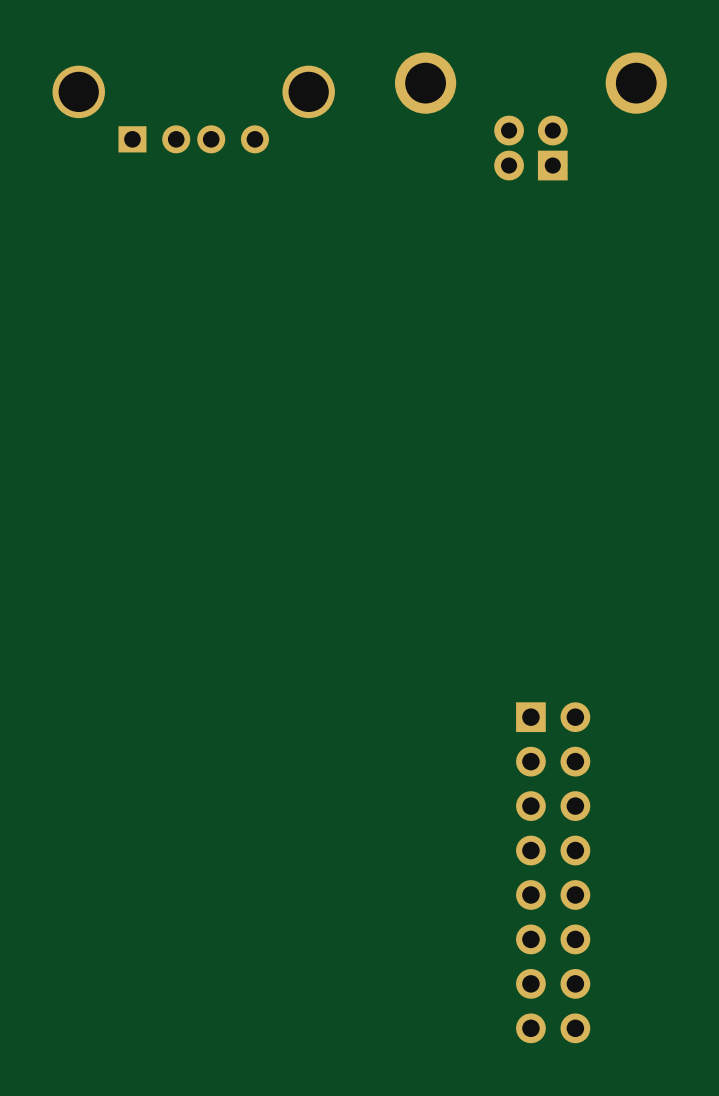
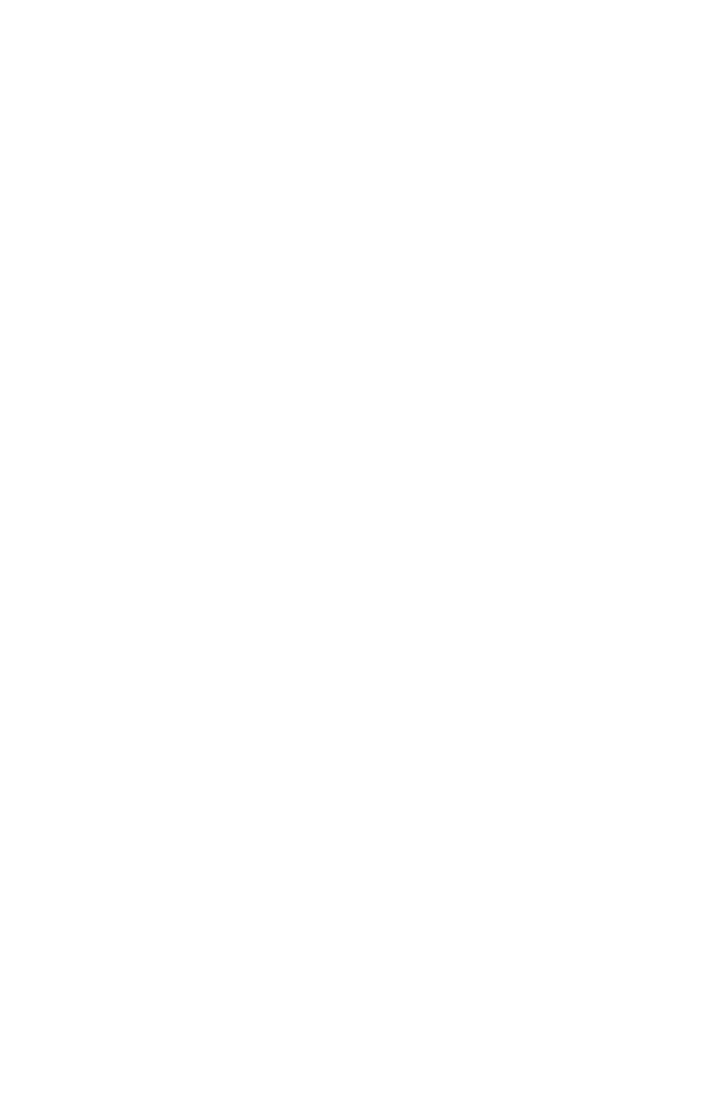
part: (193, 109) -> none
part: (530, 116) -> none
part: (553, 872) -> none

